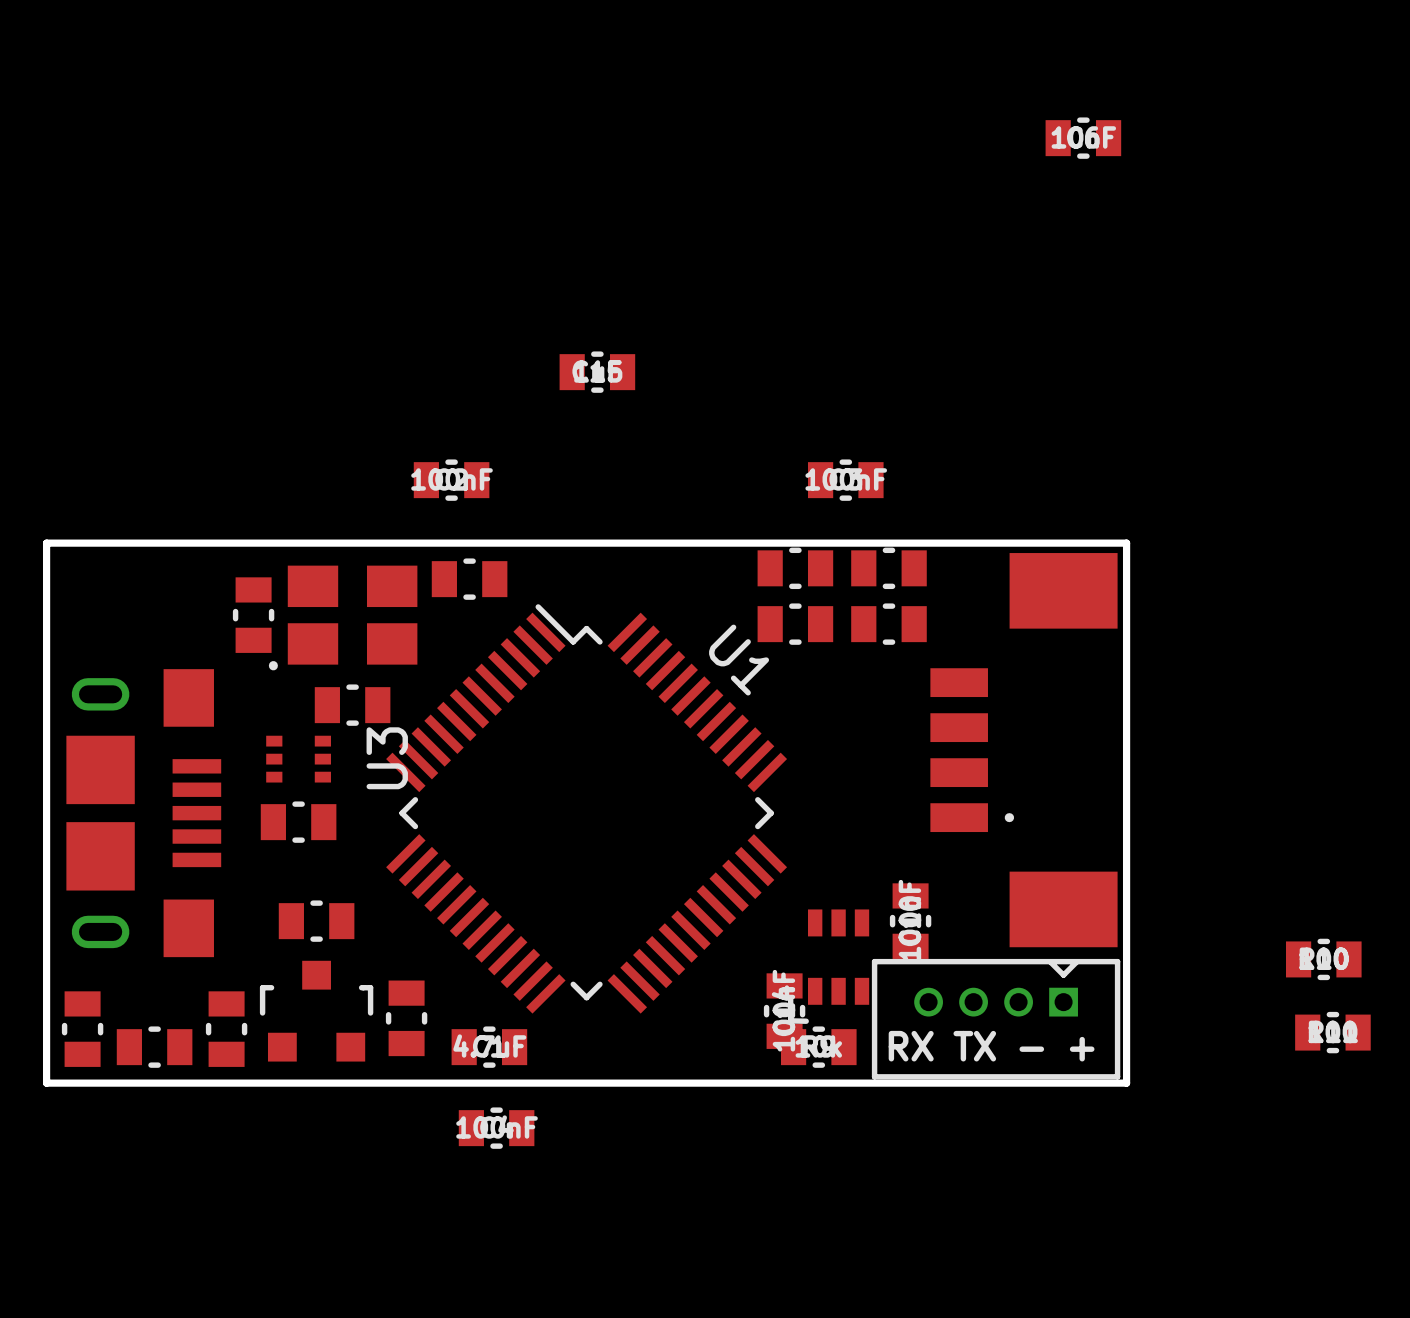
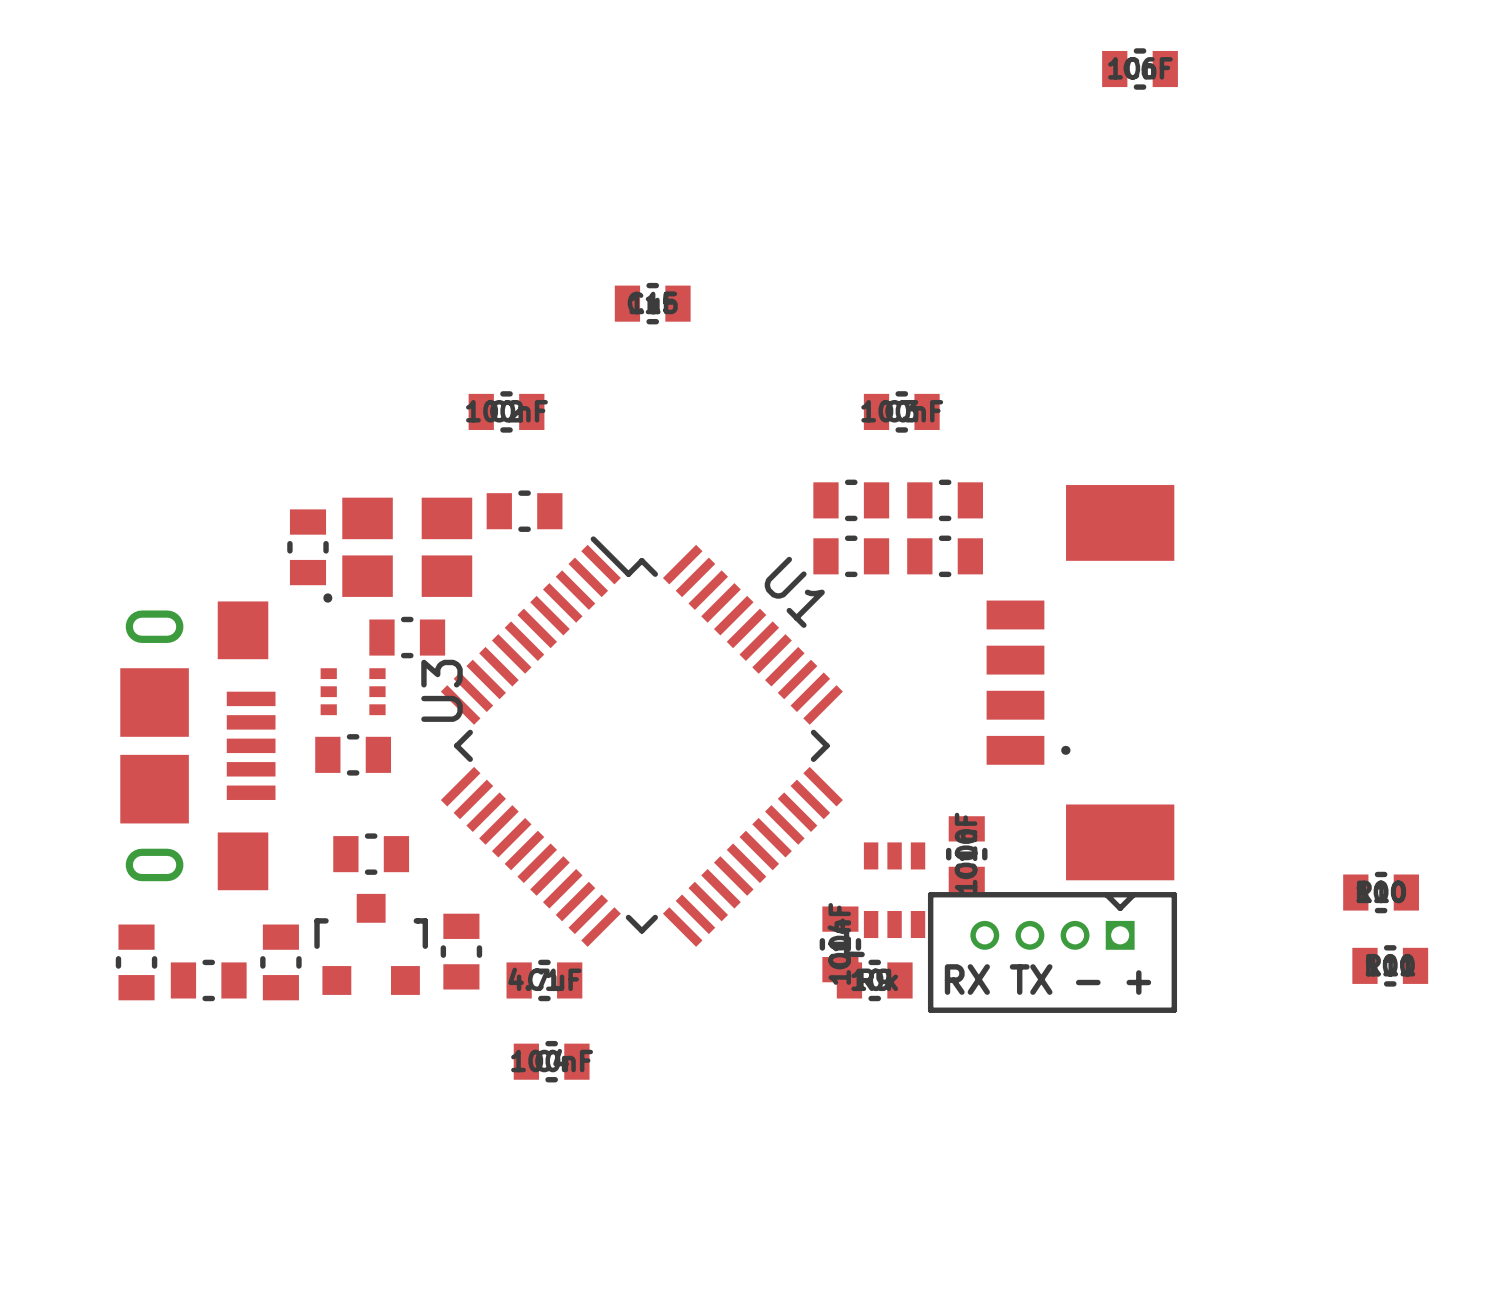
board edge: (46, 543) (1126, 543) (1126, 1083) (46, 1083) (46, 543) -> none

